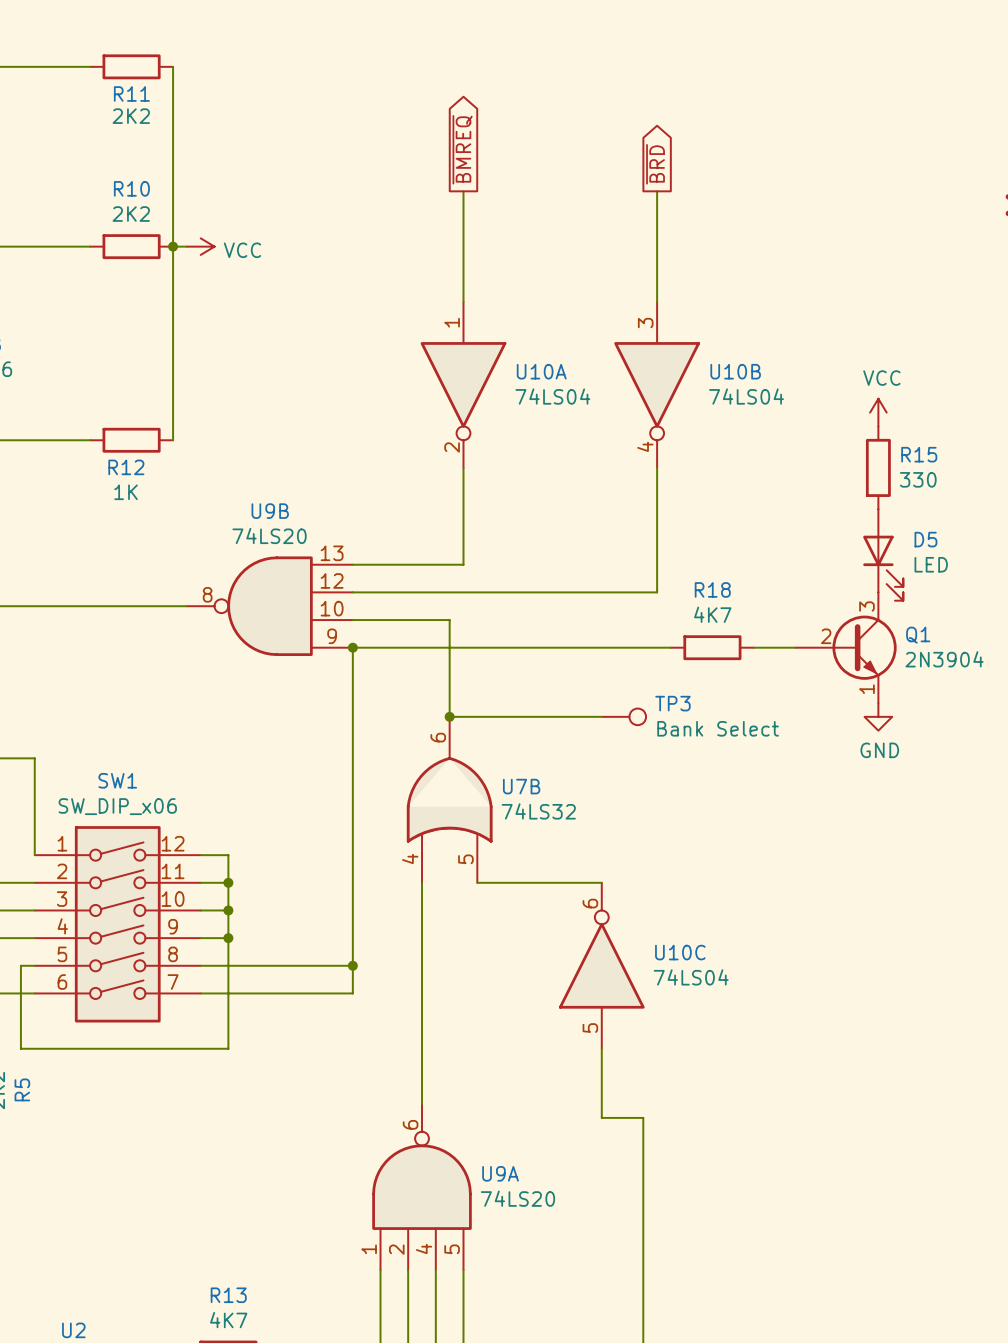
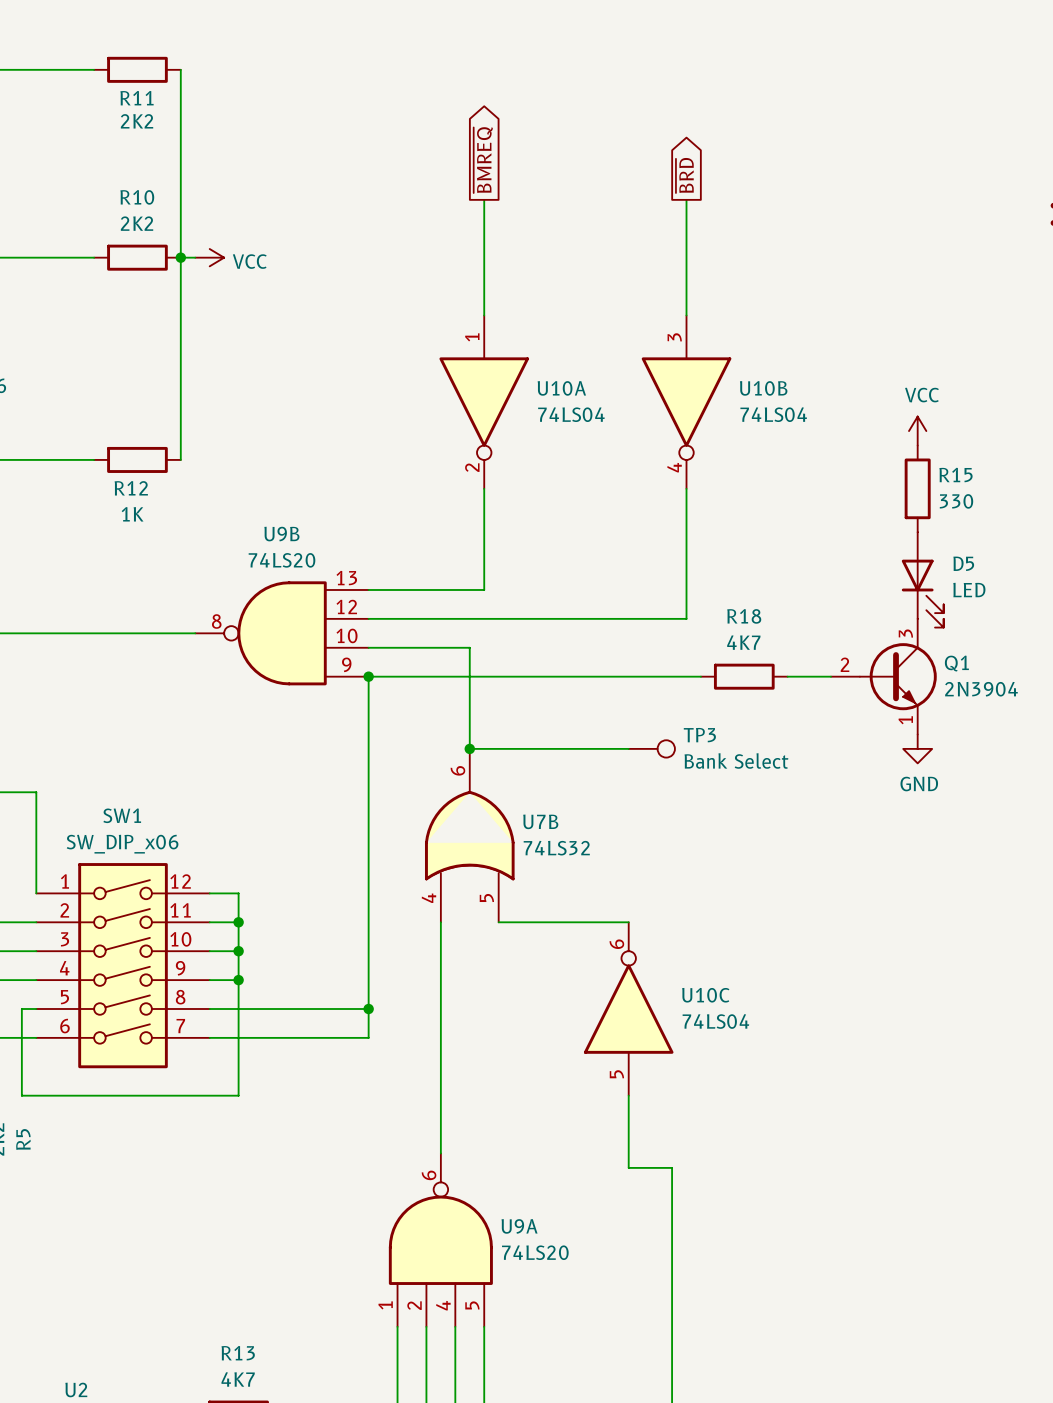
Q1 symbol: [795, 592, 897, 704] -> [830, 618, 937, 735]

